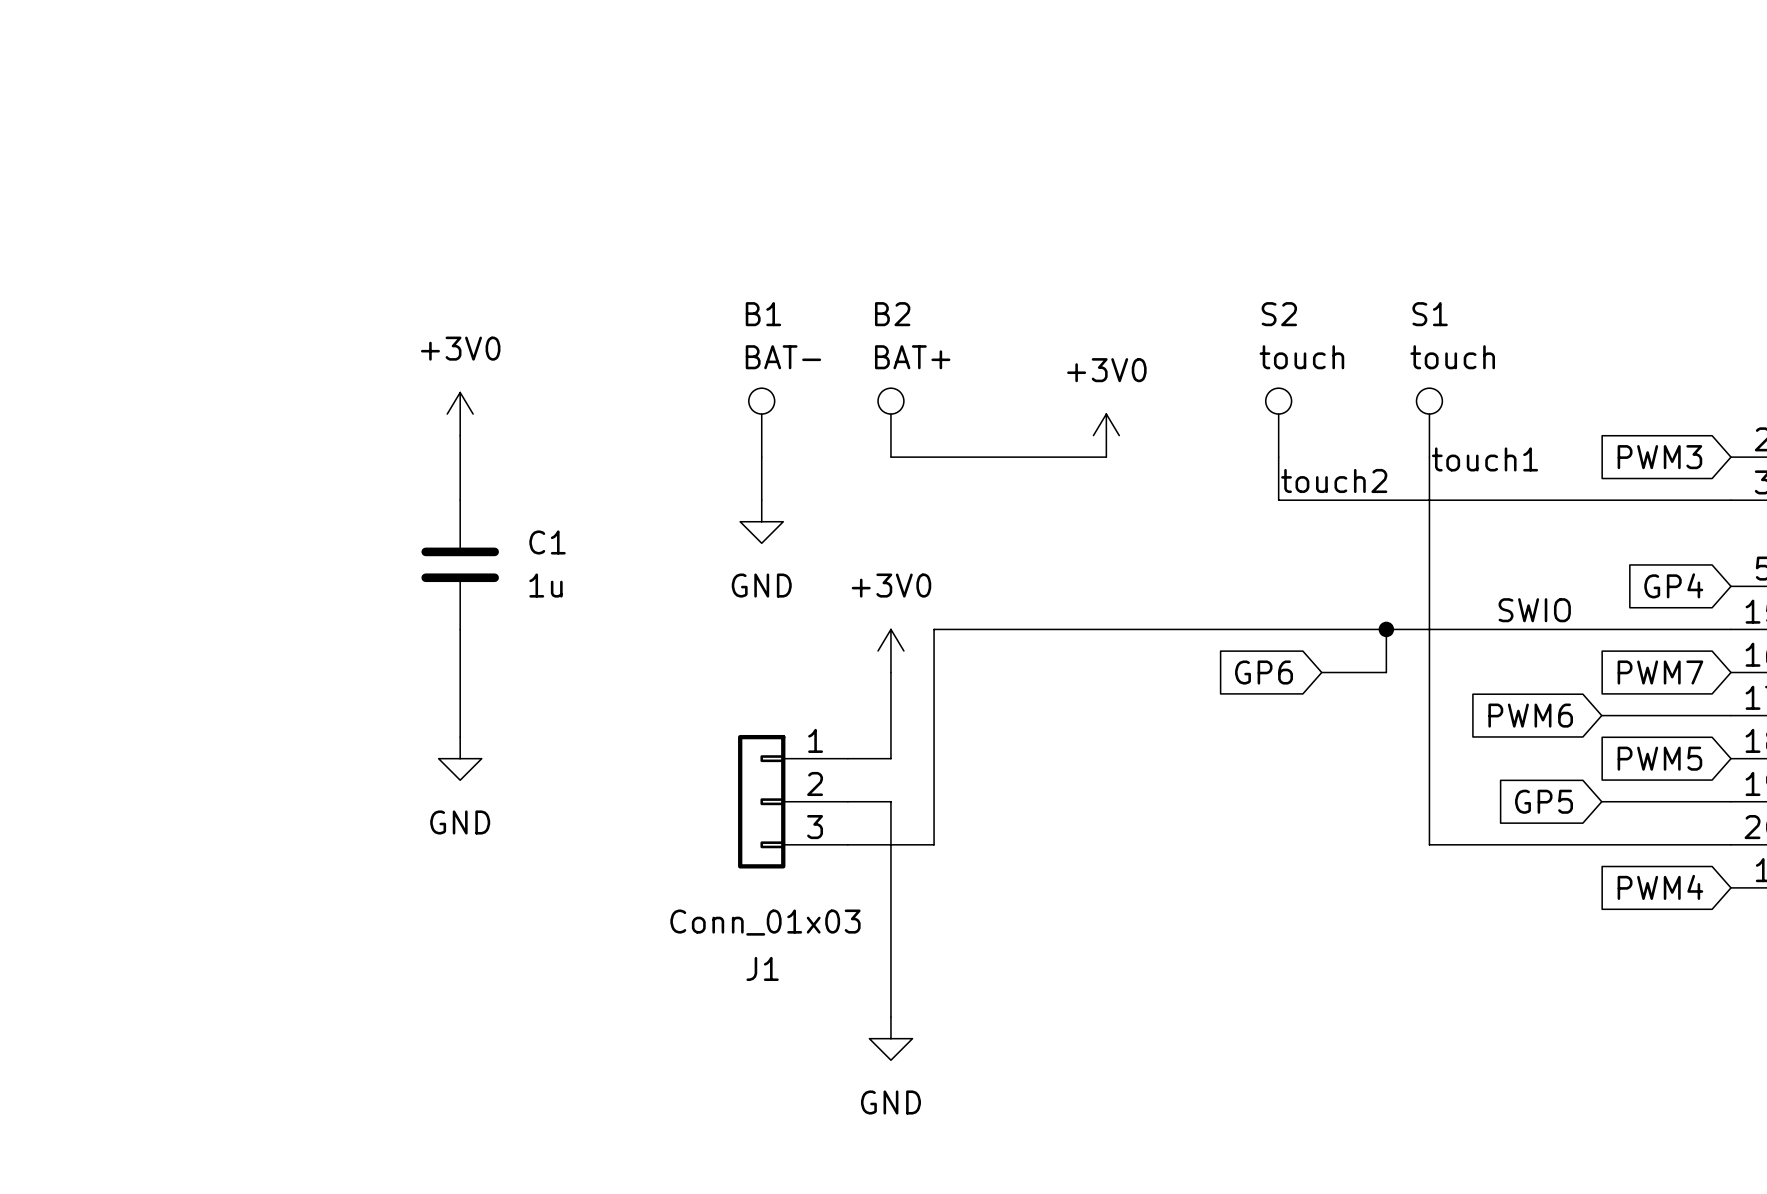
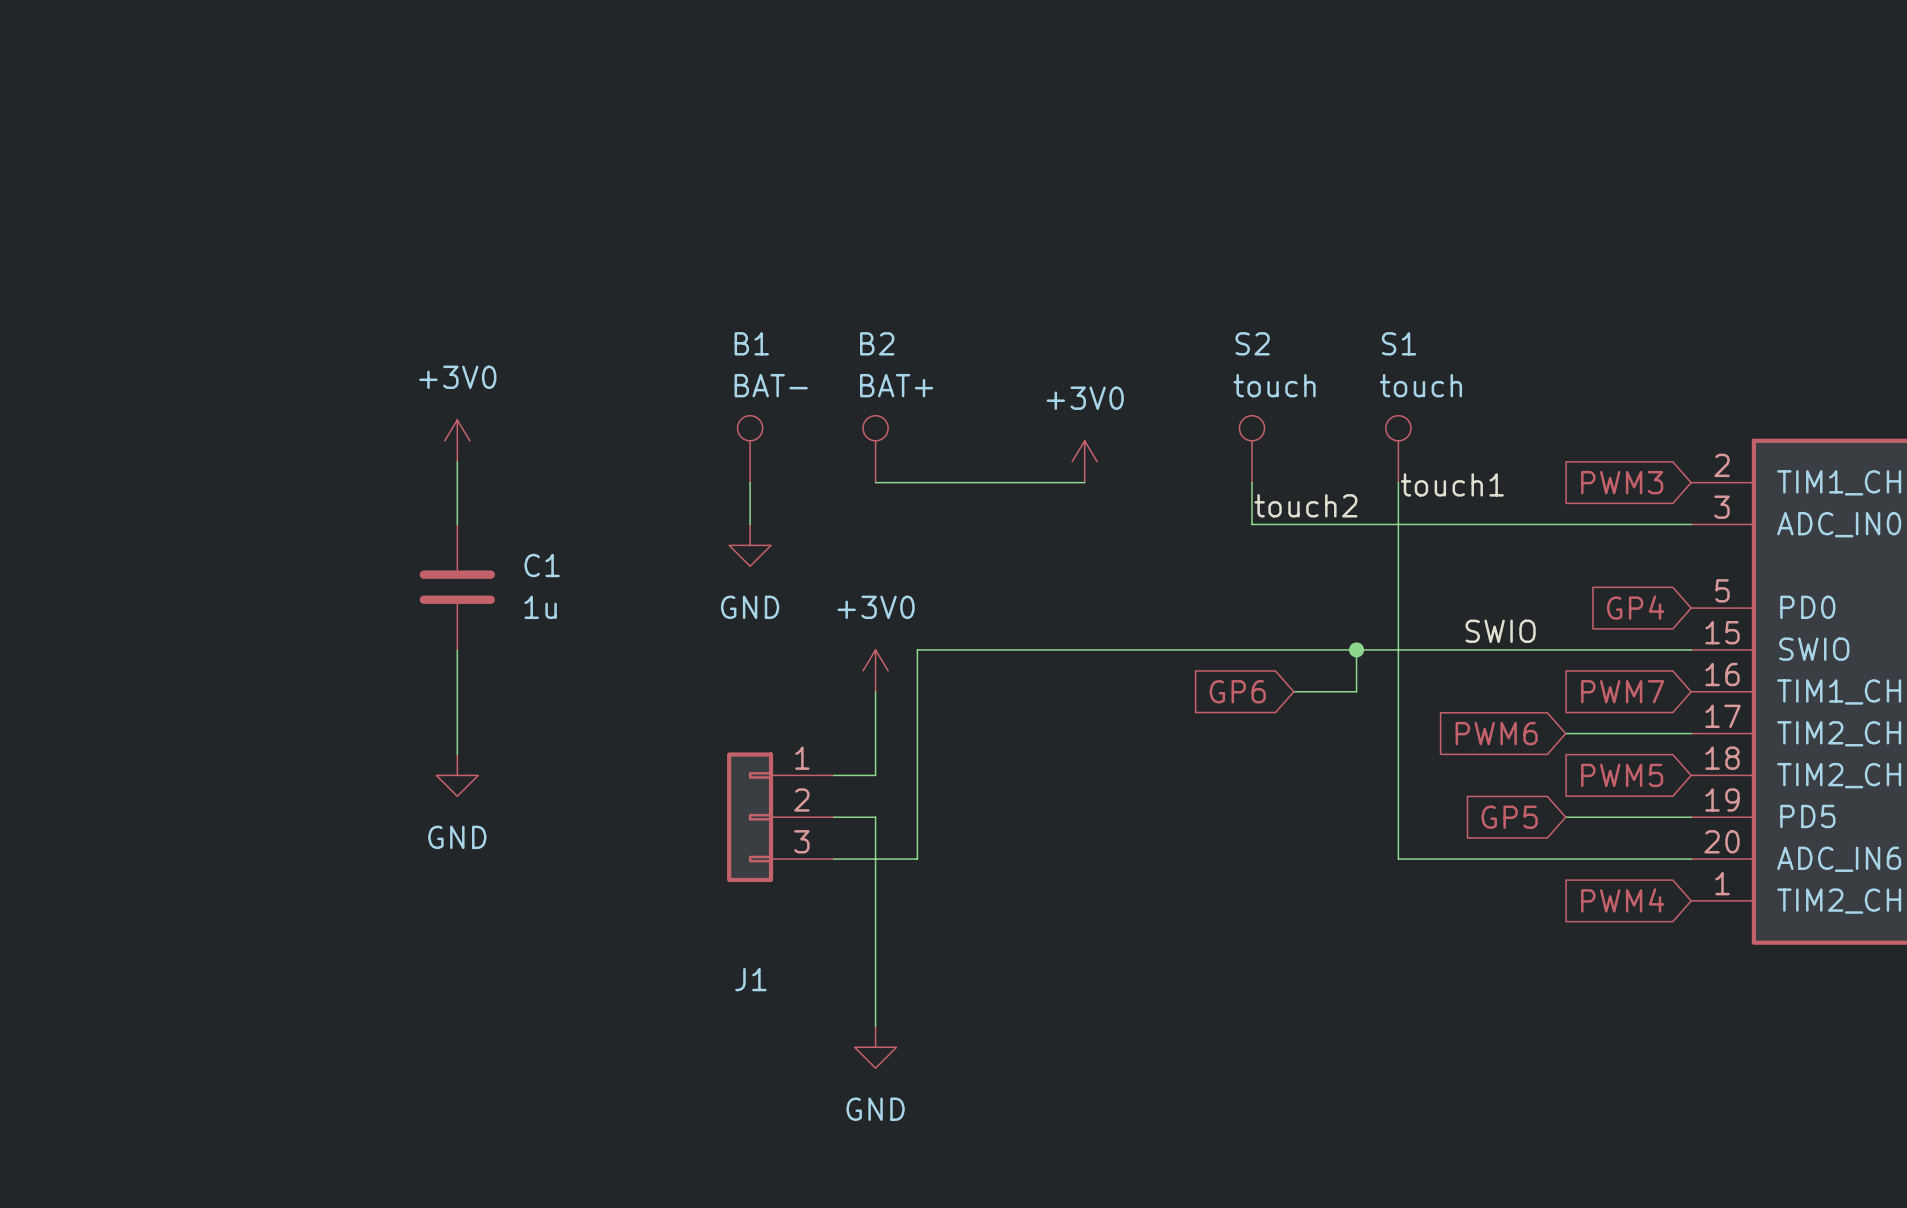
J1 value: Conn_01x03 (765, 922) -> none

